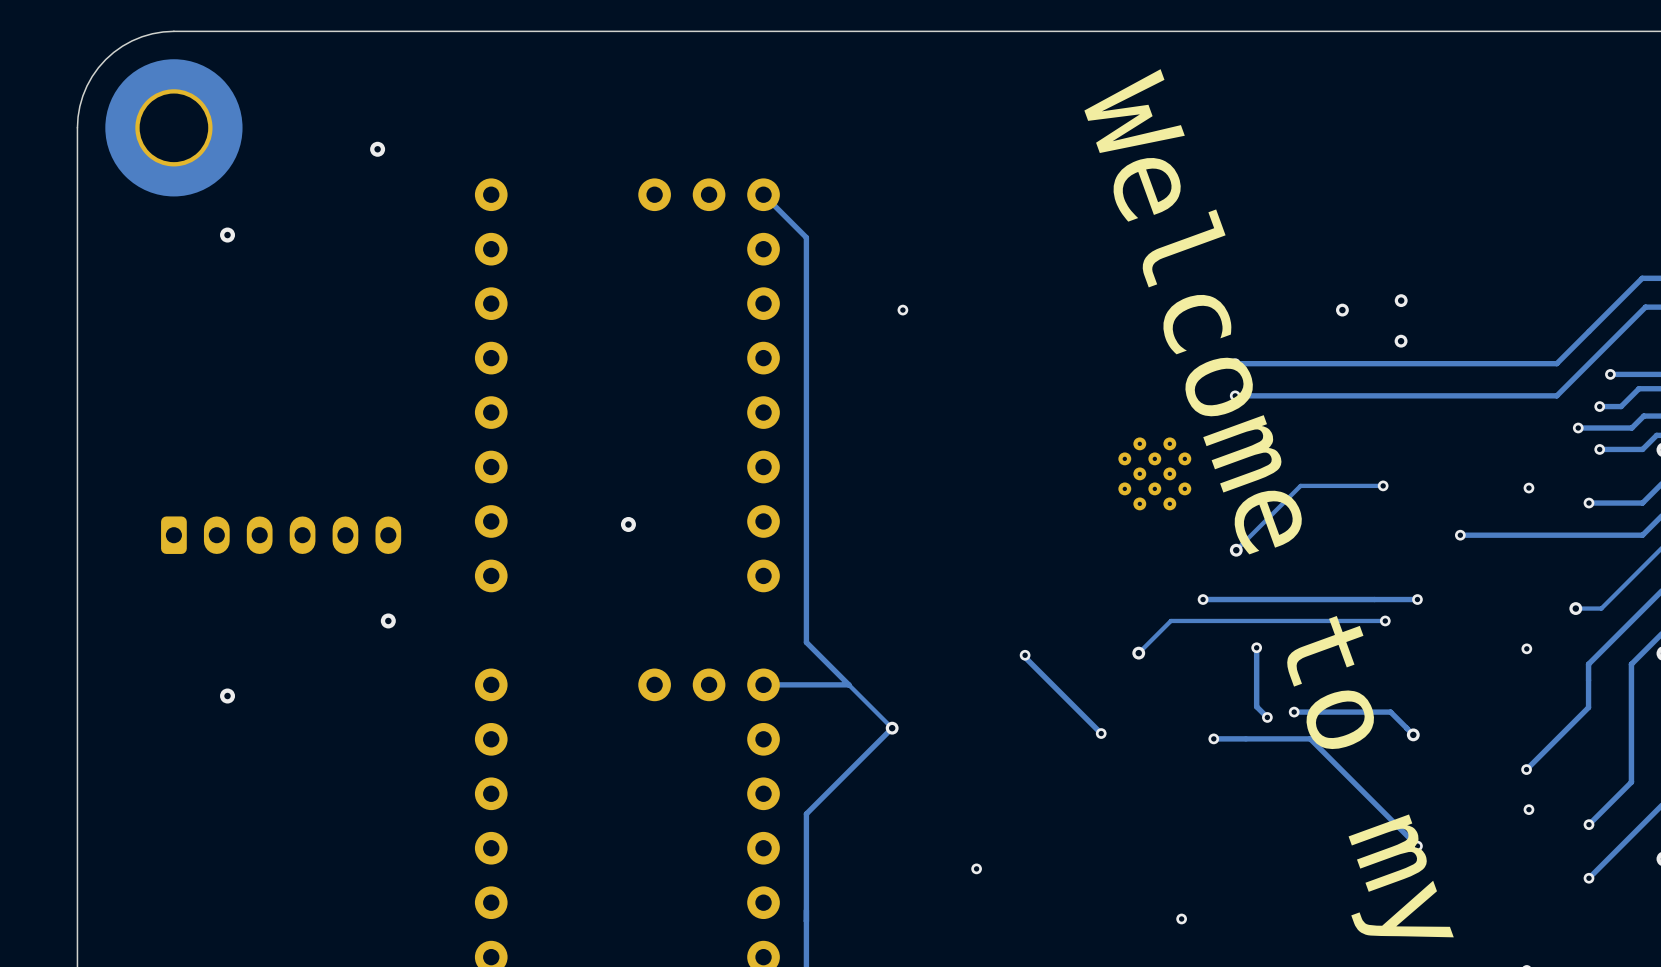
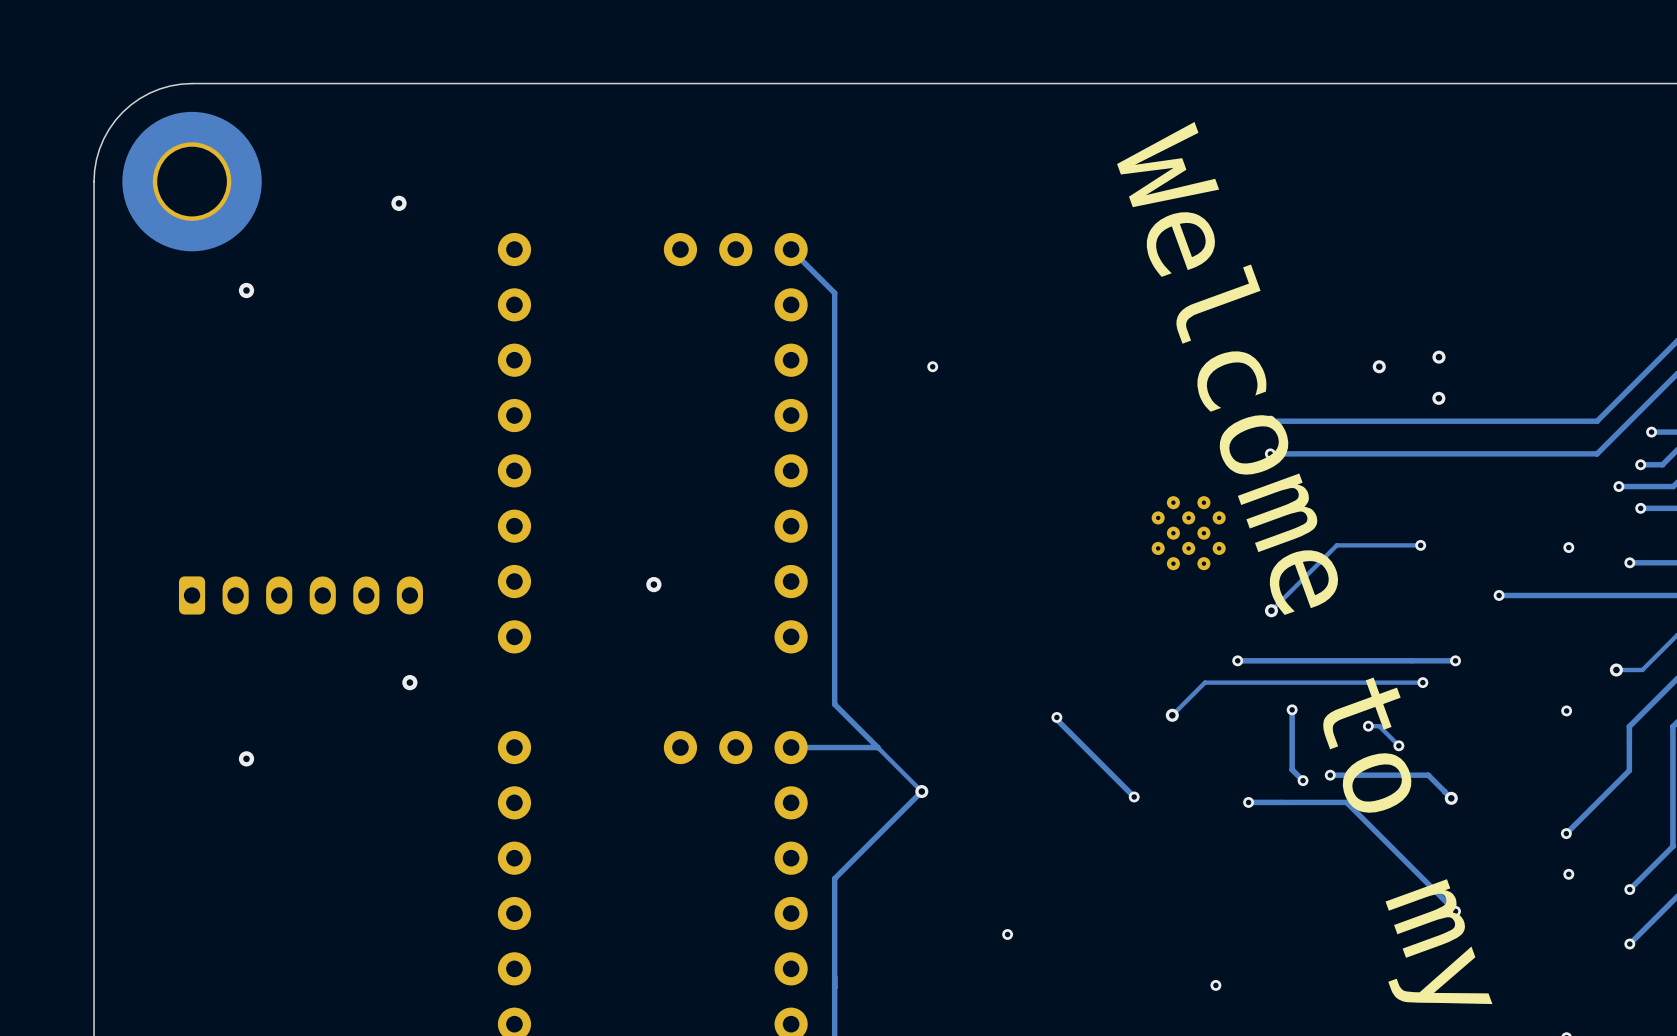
track: none -> (1368, 726) (1379, 726) (1398, 745)
via: none -> (1368, 726)
via: none -> (1398, 745)

